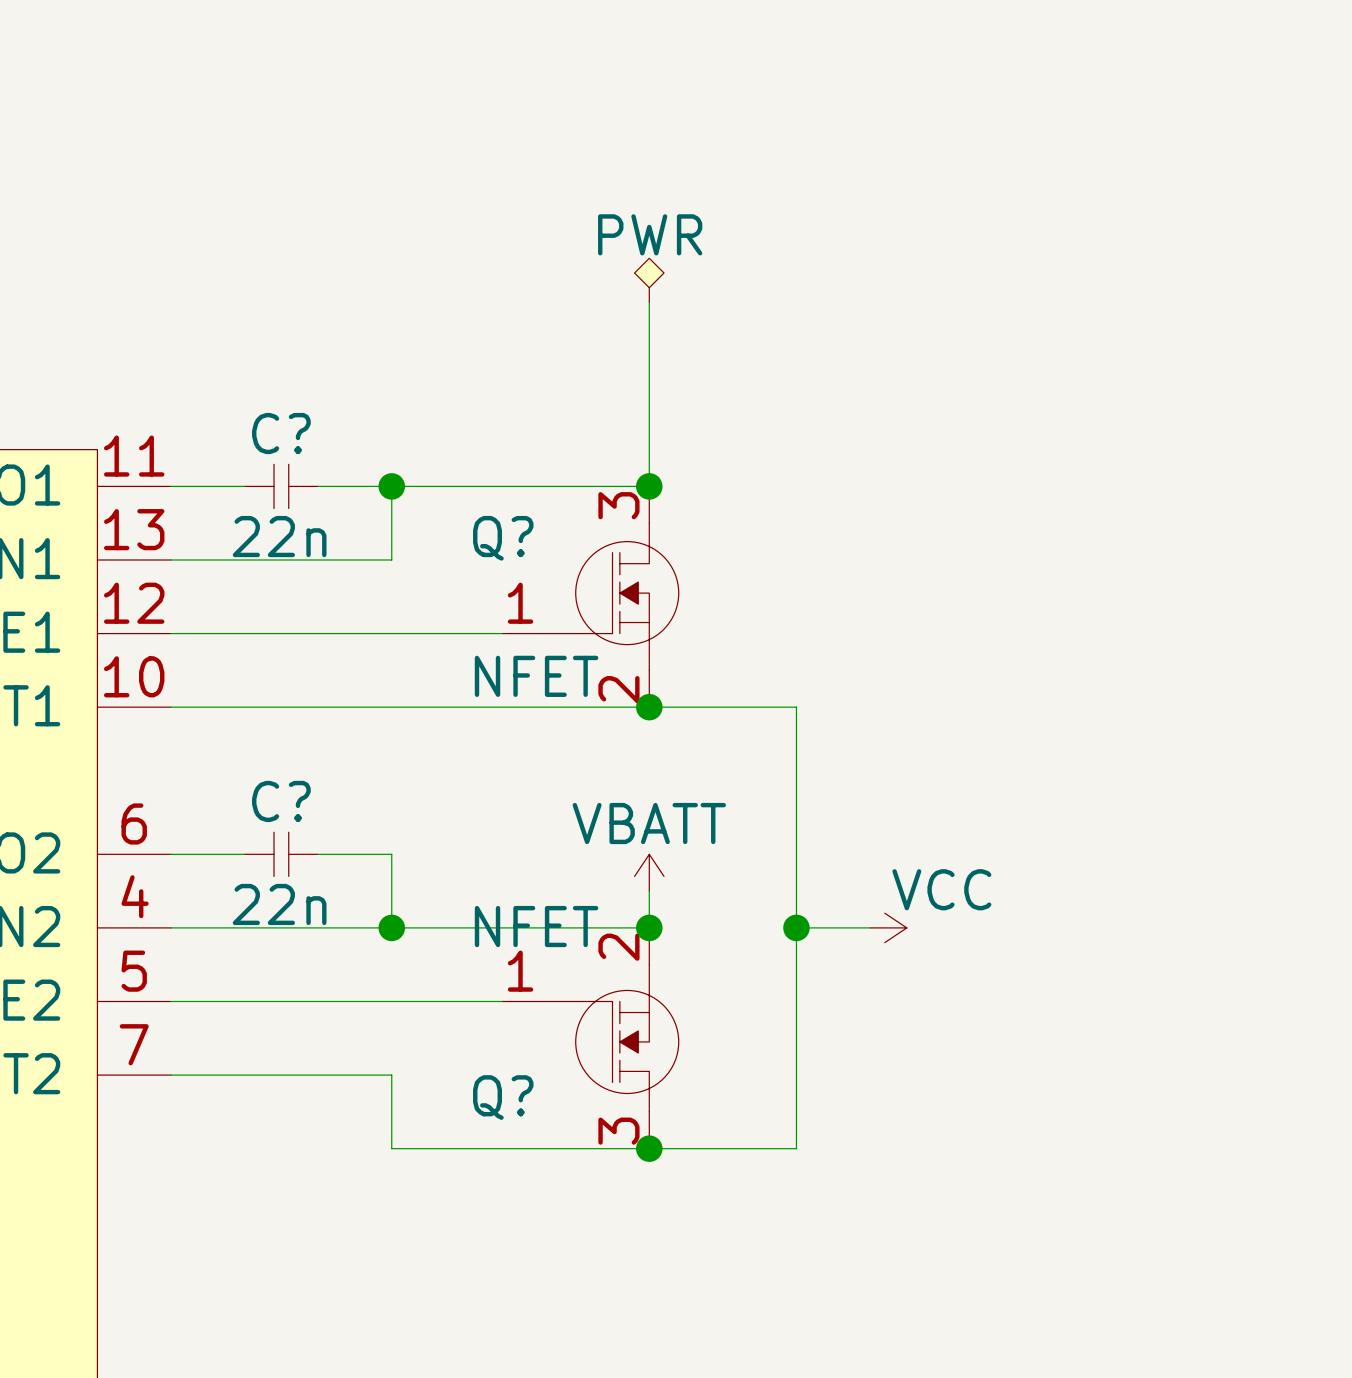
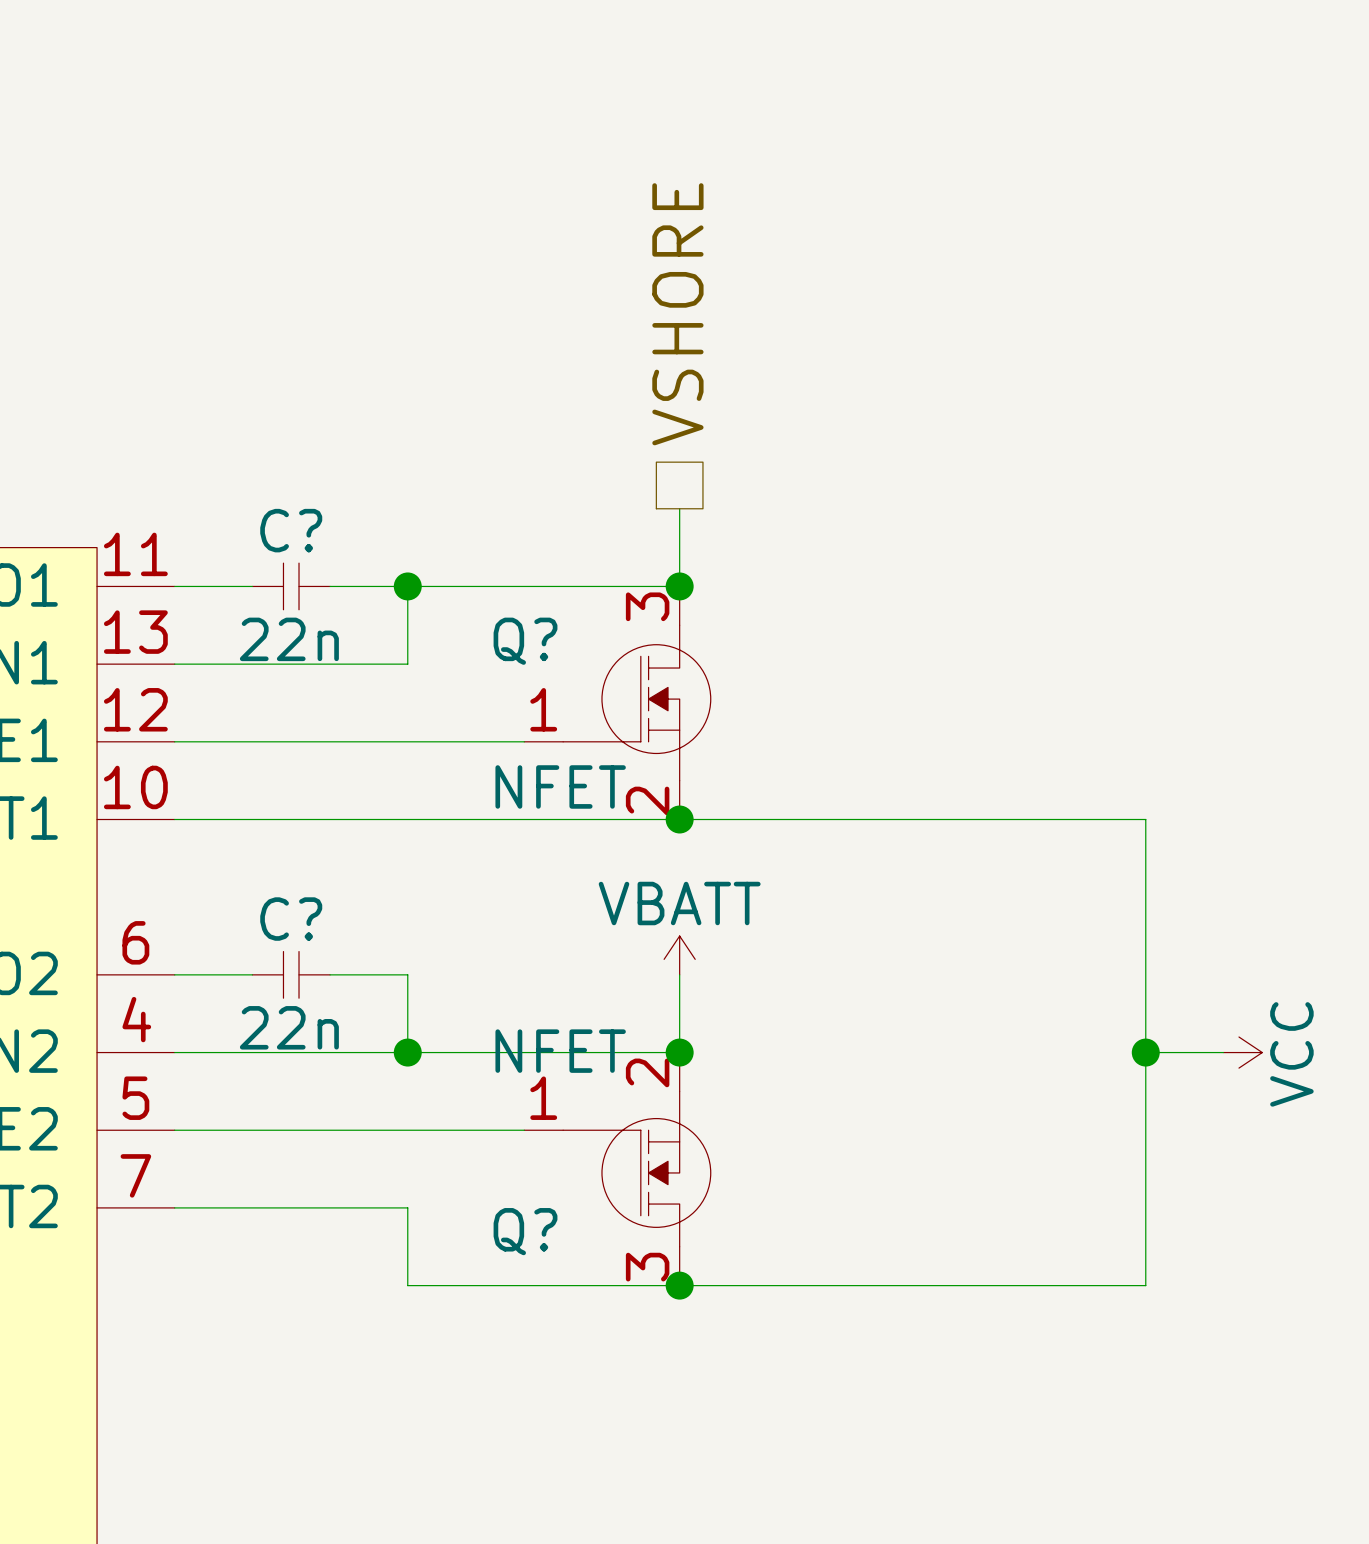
hierarchical label: none -> VSHORE (677, 314)
power symbol: PWR (649, 280) -> none
wire: (649, 302) (649, 412) -> none
wire: (796, 707) (796, 1148) -> (835, 819) (1145, 819) (1145, 1285) (835, 1285)
power symbol position: VBATT (649, 872) -> VBATT (679, 955)
power symbol text rotation: 0° (941, 889) -> 90° counterclockwise (1291, 1054)
wire: (796, 927) (870, 927) -> (1145, 1052) (1223, 1052)
junction: (796, 927) -> none
power symbol position: VCC (888, 927) -> VCC (1242, 1052)
junction: none -> (1145, 1052)

